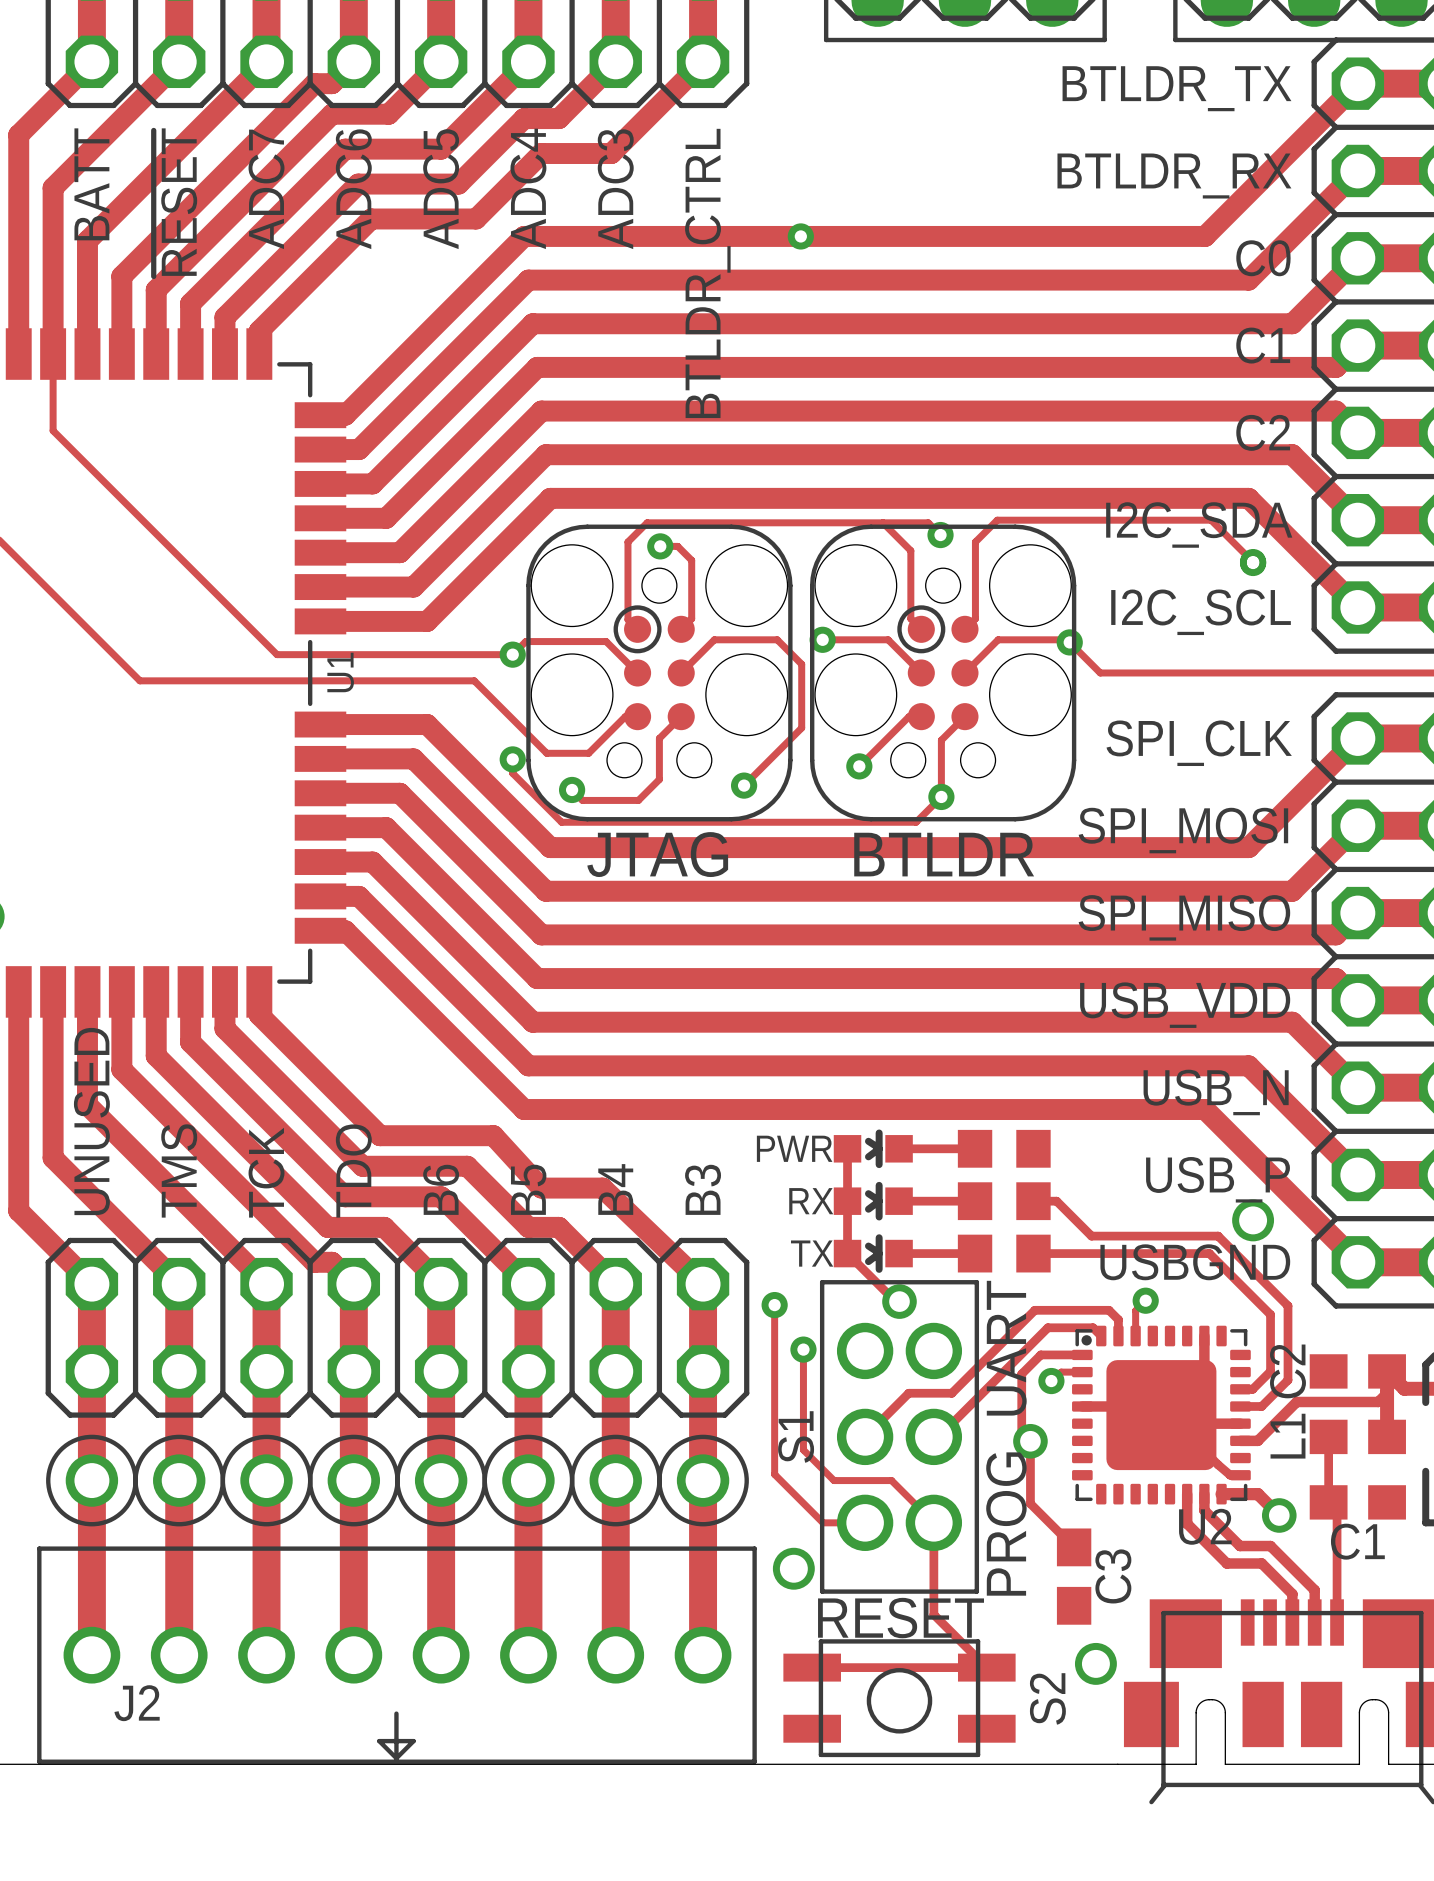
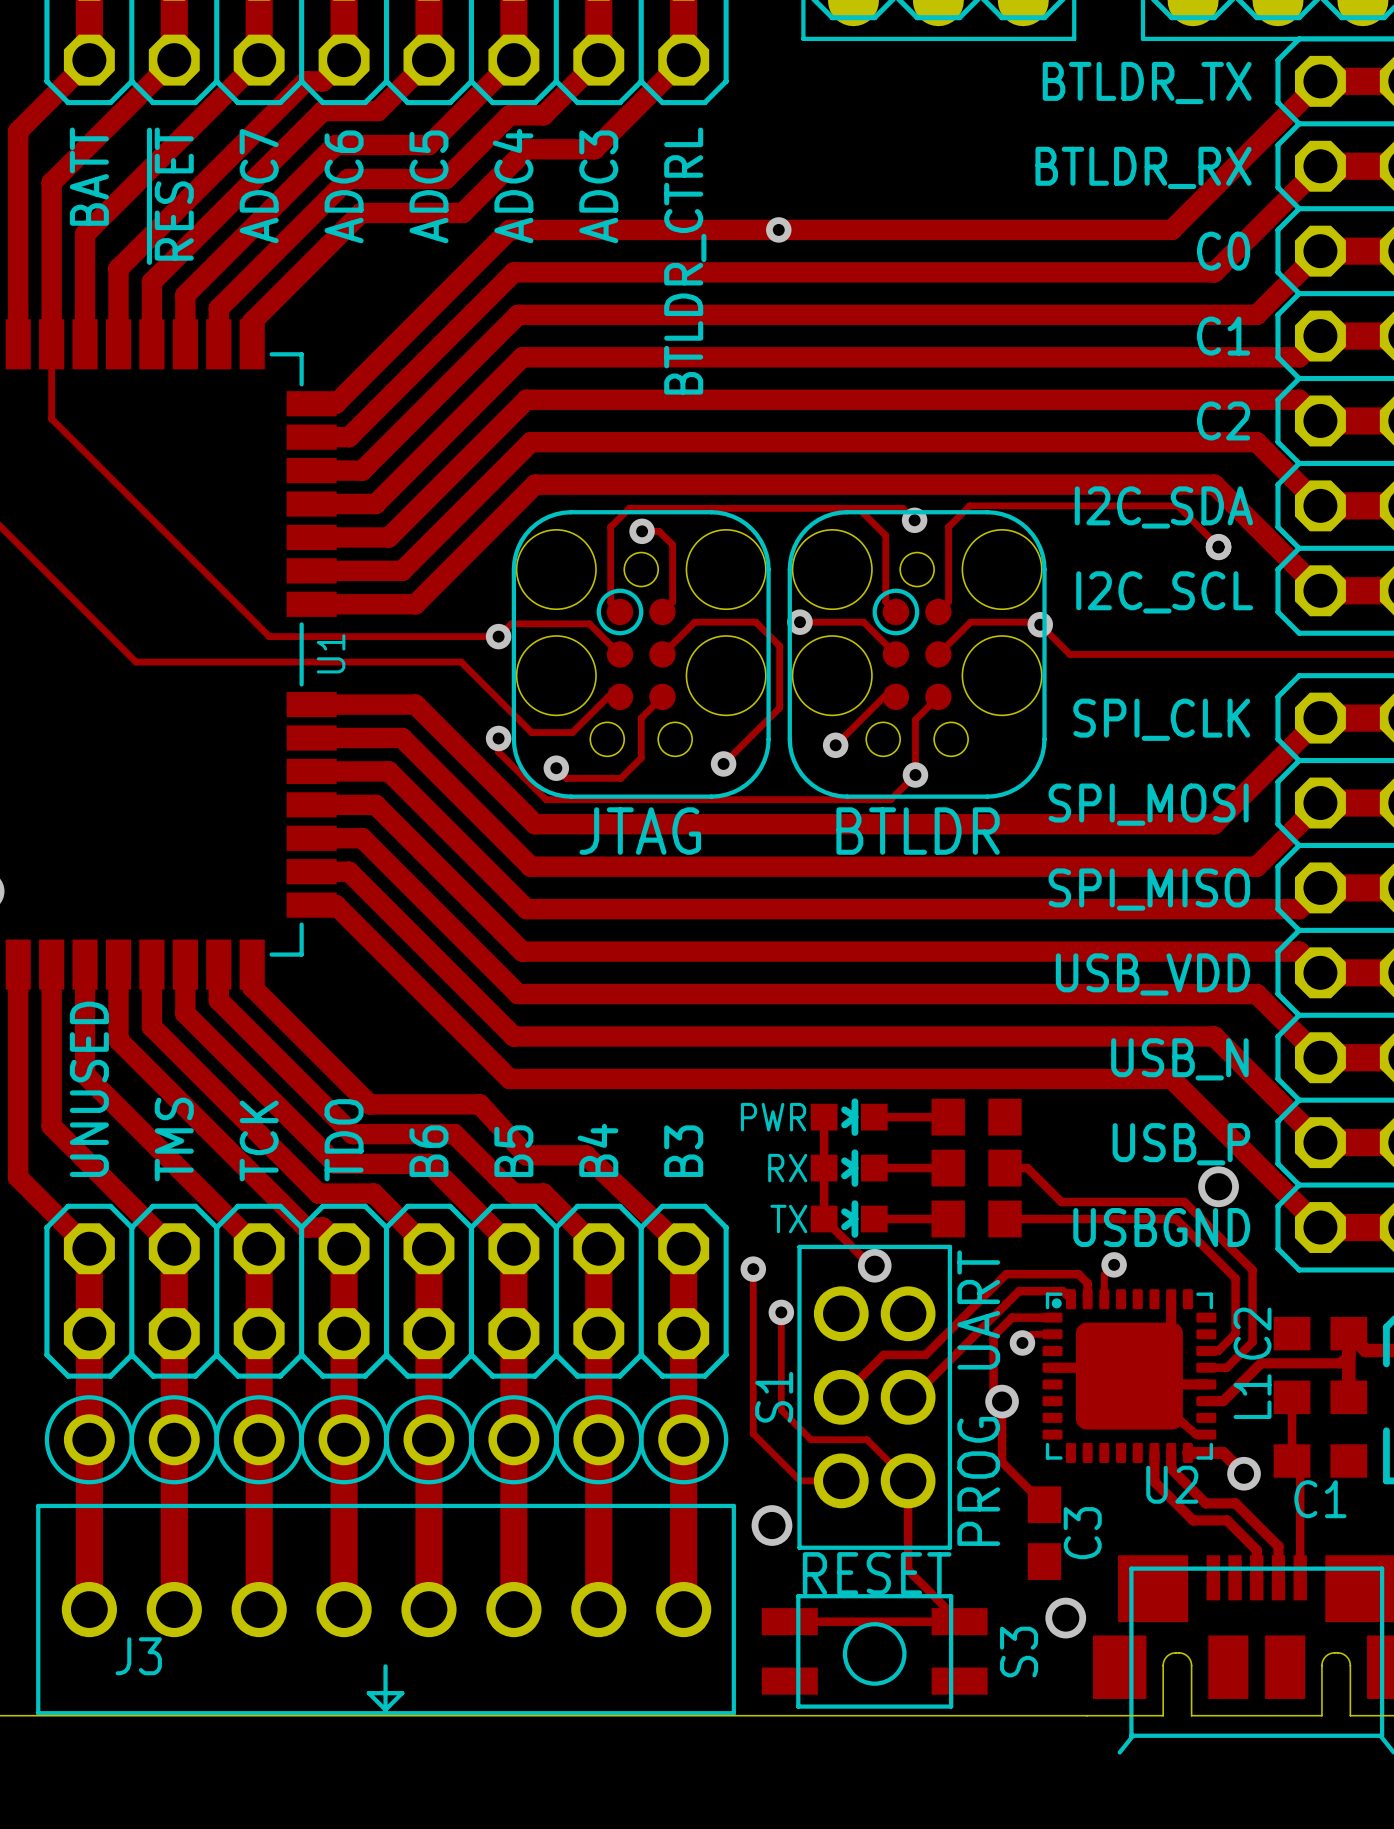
S2 name: S2 (1047, 1698) -> S3 (1019, 1652)
J2 name: J2 (137, 1703) -> J3 (138, 1656)

